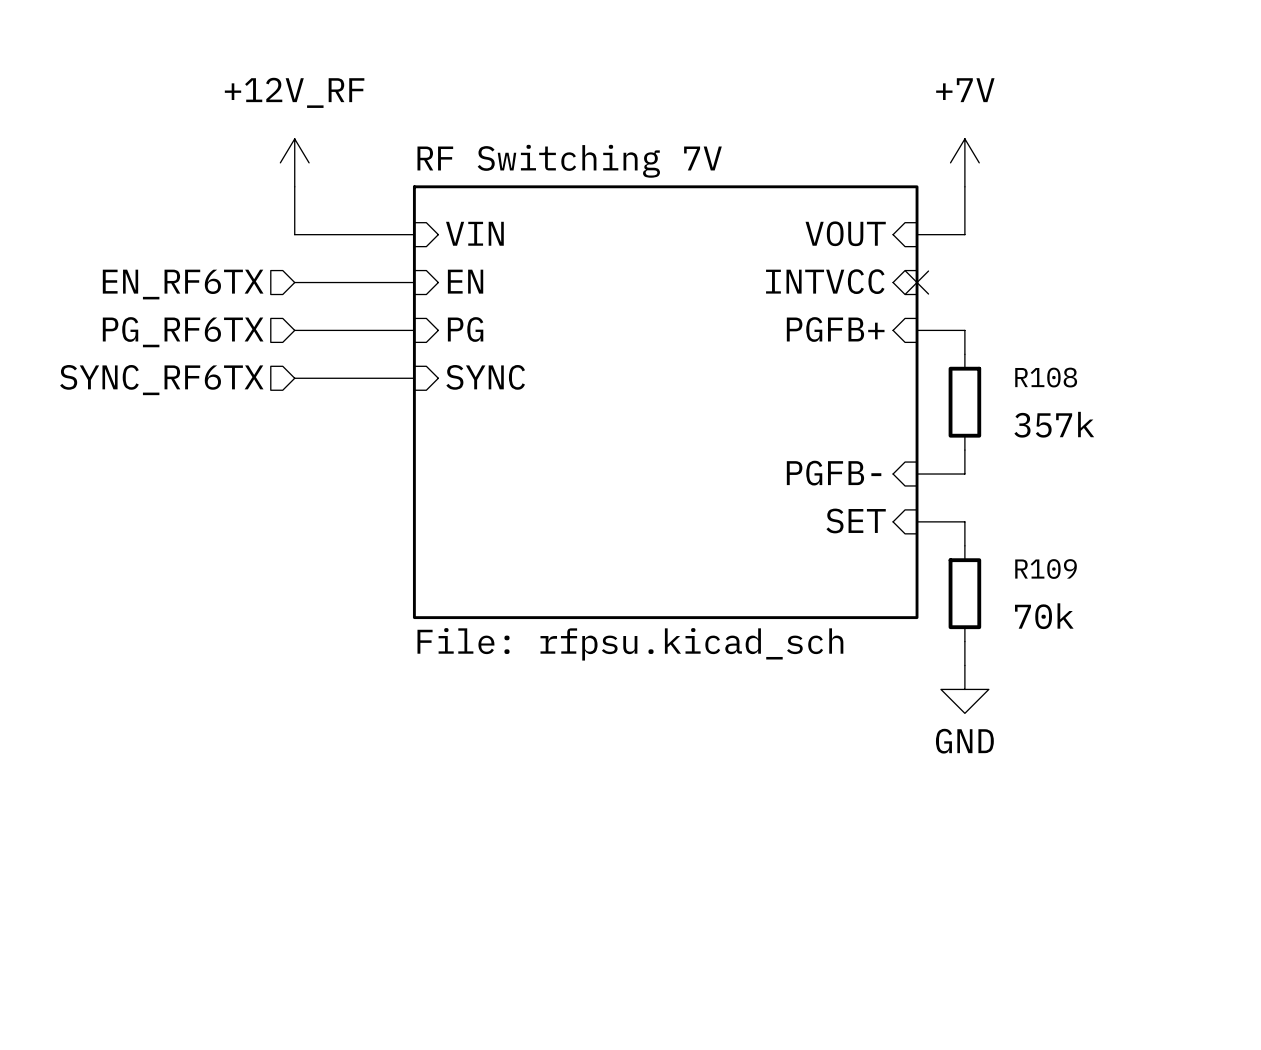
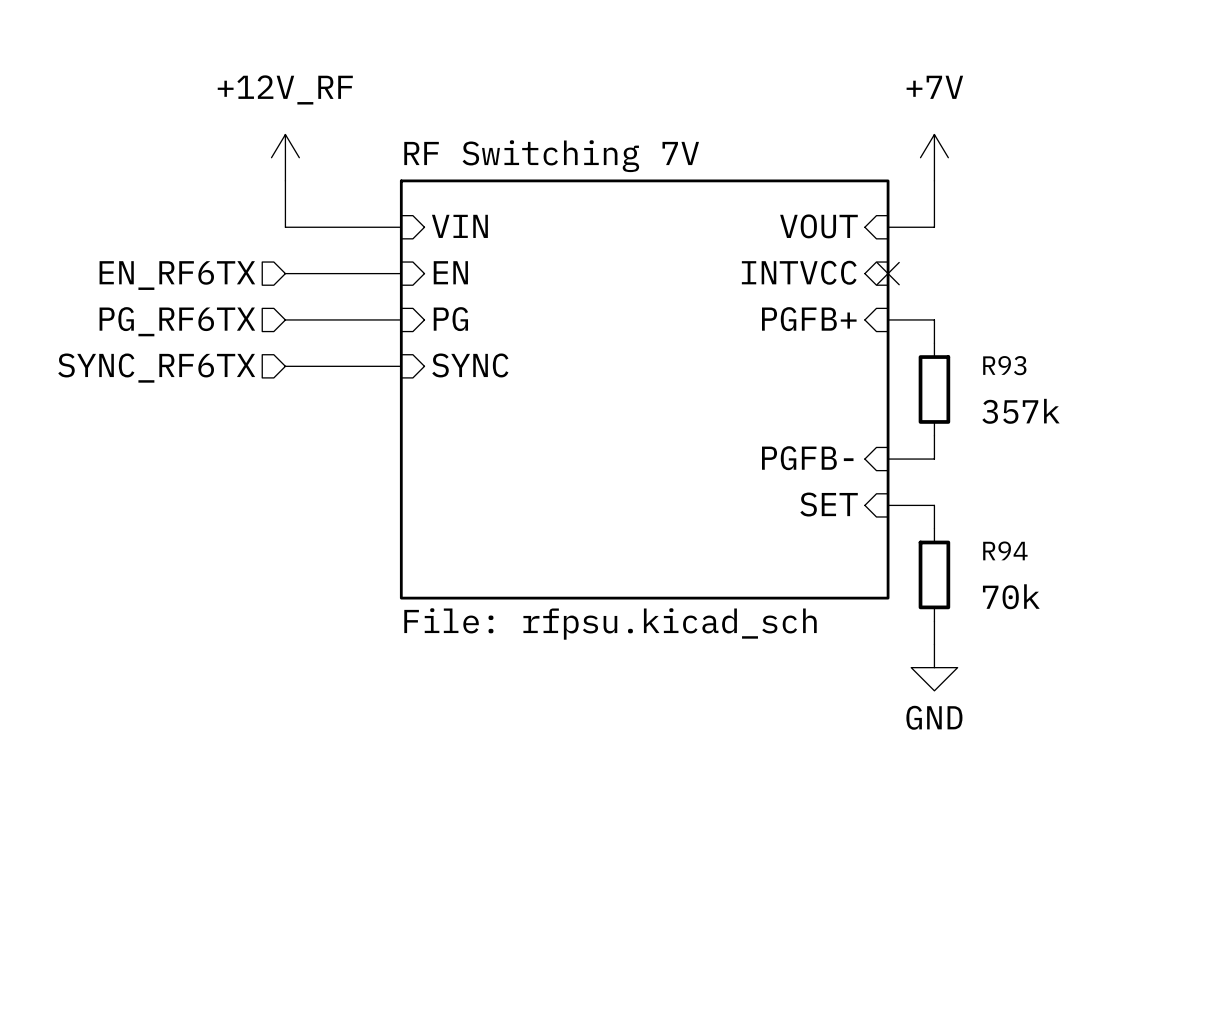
R108 name: R108 (1046, 377) -> R93 (1004, 365)
R109 name: R109 (1046, 569) -> R94 (1005, 550)

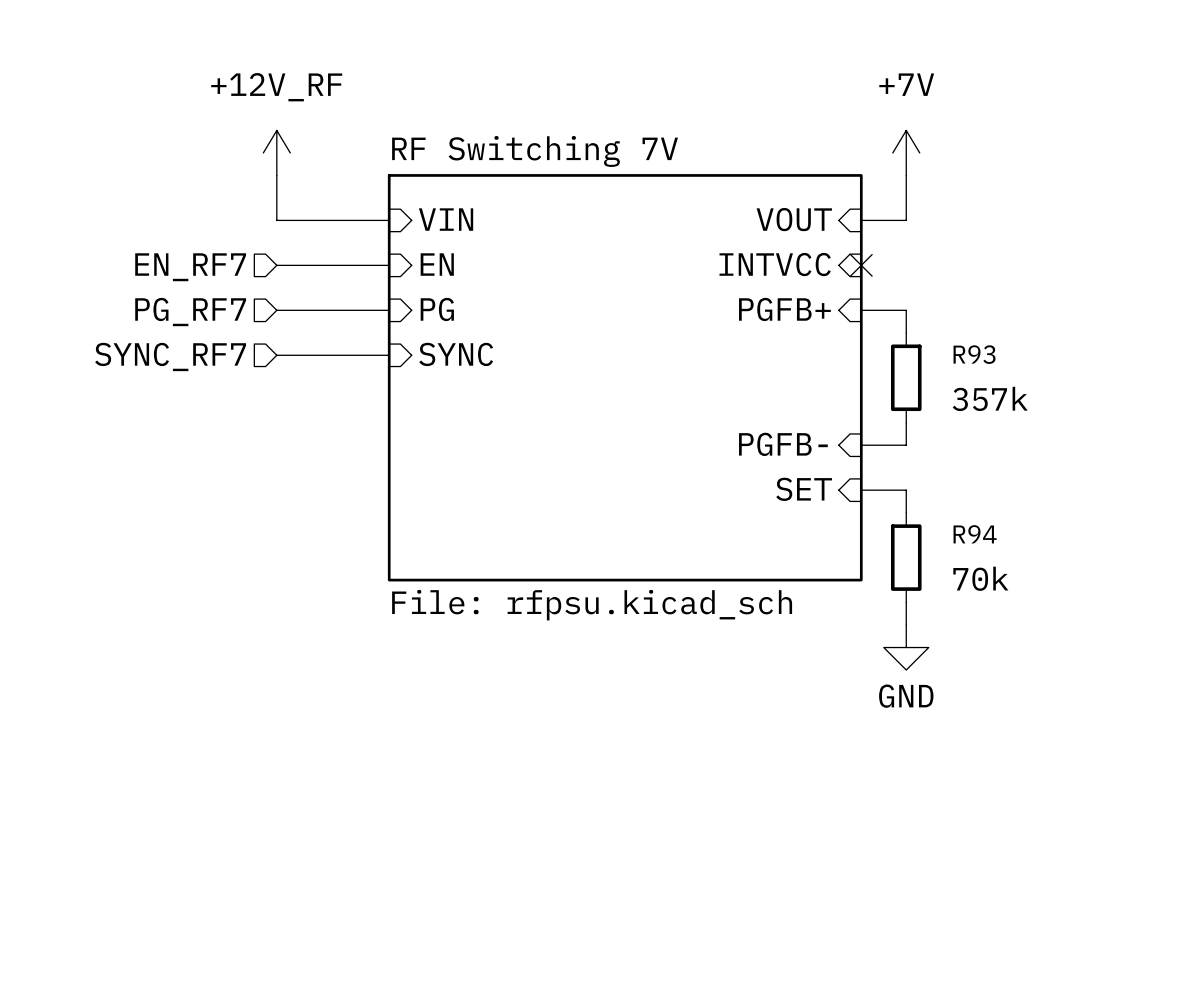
hierarchical label: EN_RF6TX (177, 275) -> EN_RF7 (190, 267)
hierarchical label: PG_RF6TX (177, 321) -> PG_RF7 (190, 312)
hierarchical label: SYNC_RF6TX (156, 368) -> SYNC_RF7 (170, 356)

